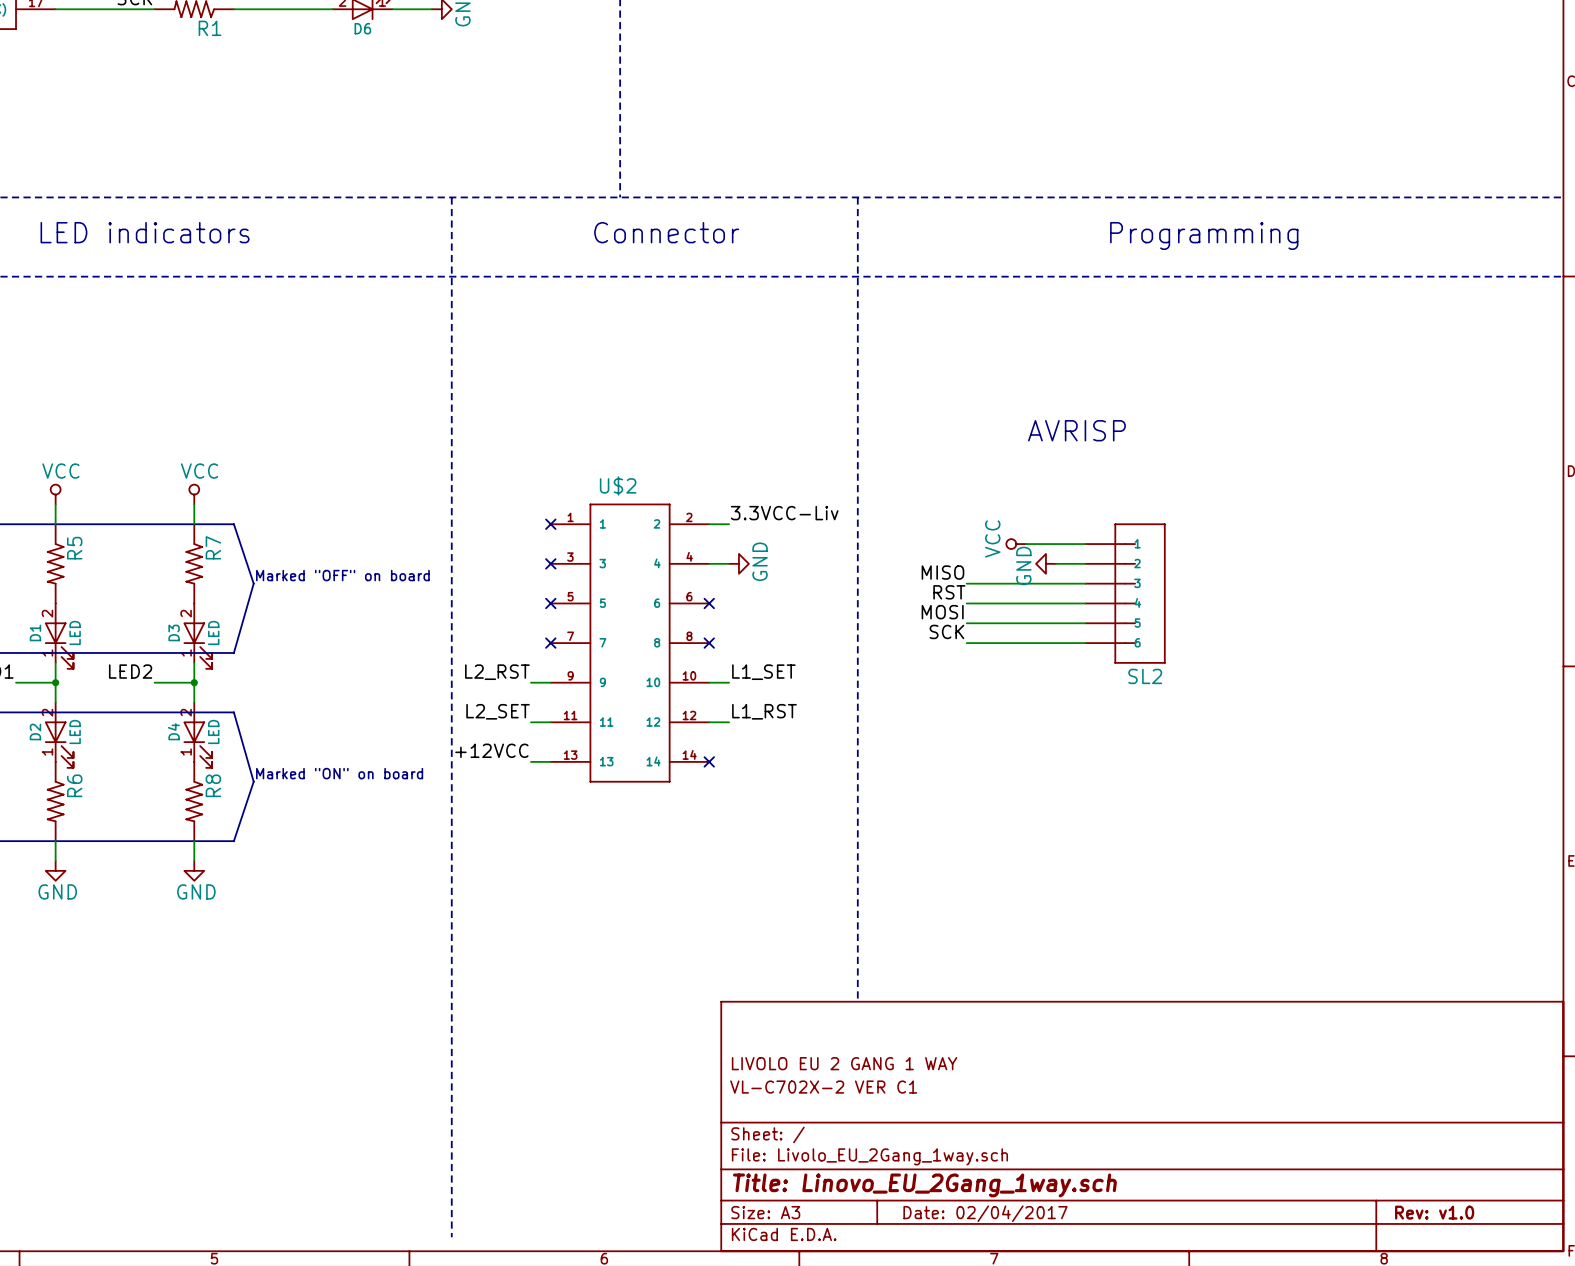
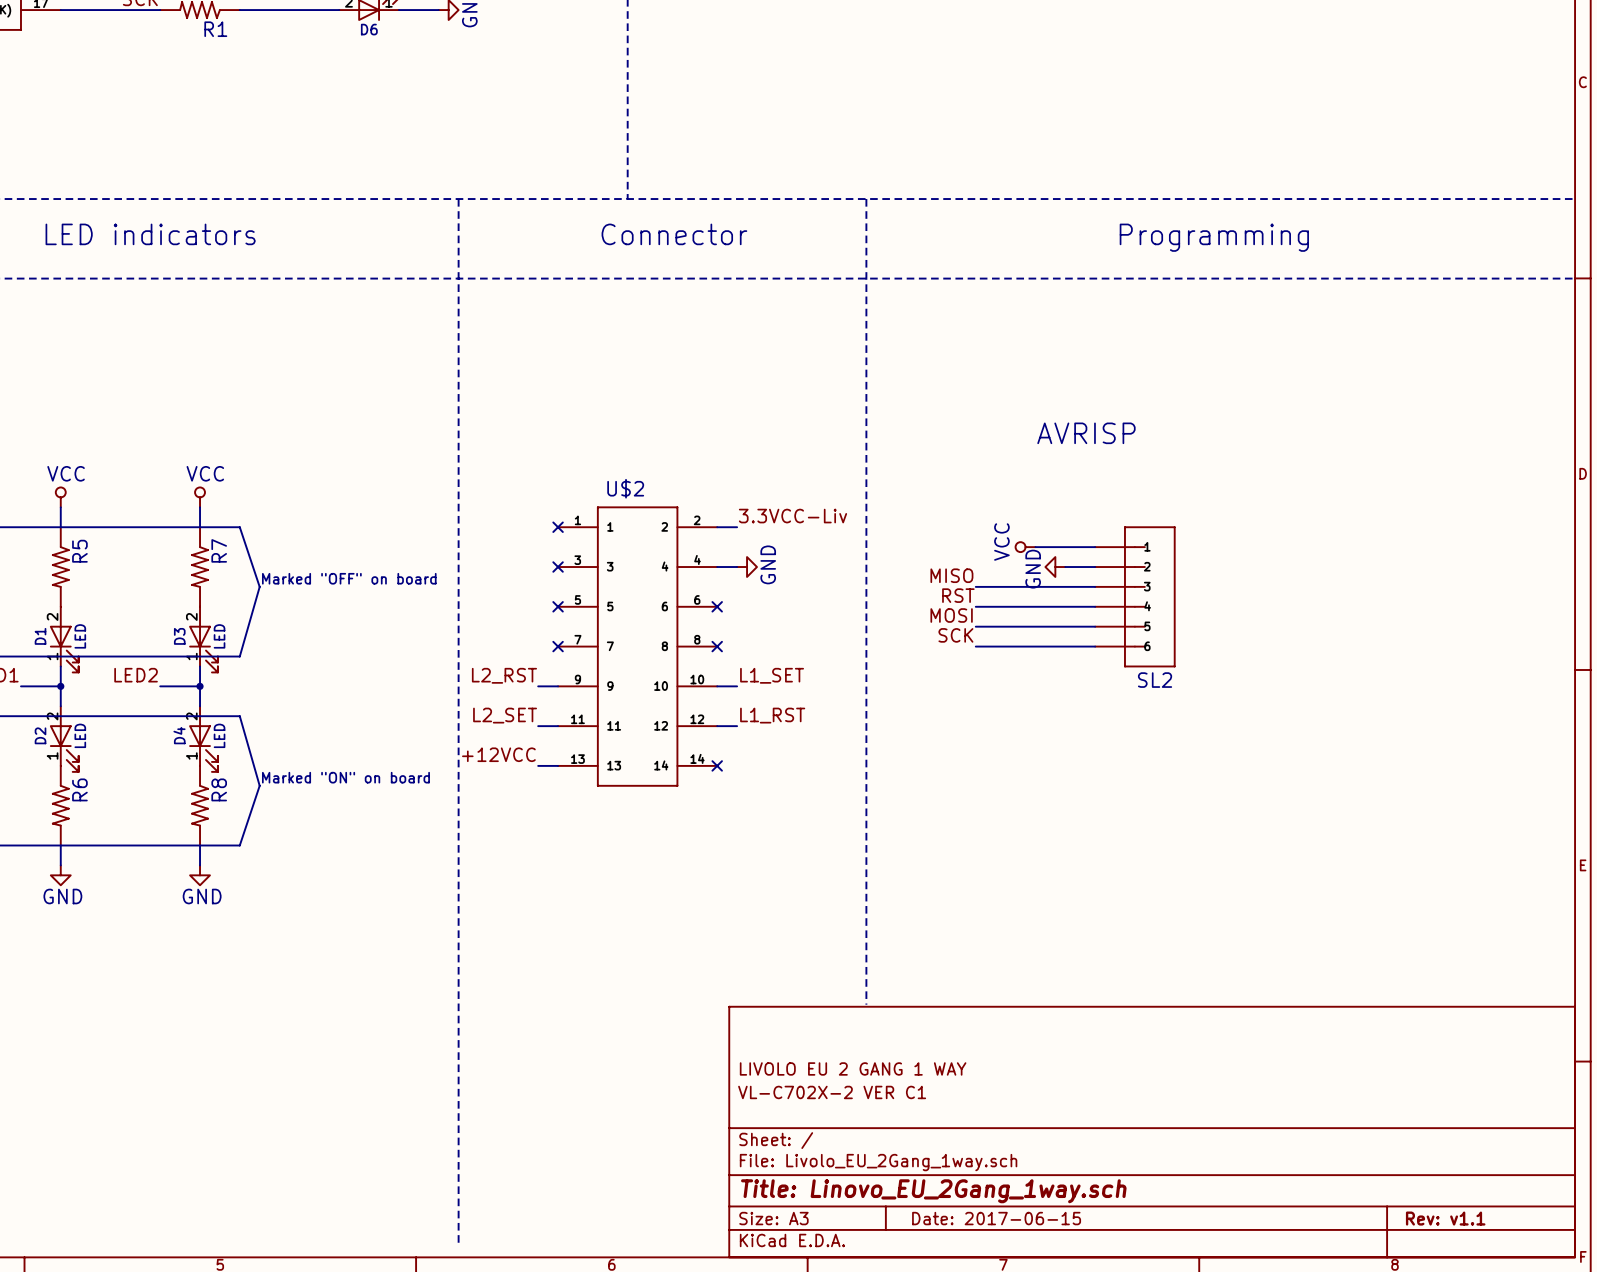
title block: Rev: v1.0 (1434, 1212) -> Rev: v1.1 (1445, 1218)
title block: Date: 02/04/2017 (985, 1213) -> Date: 2017-06-15 (996, 1218)

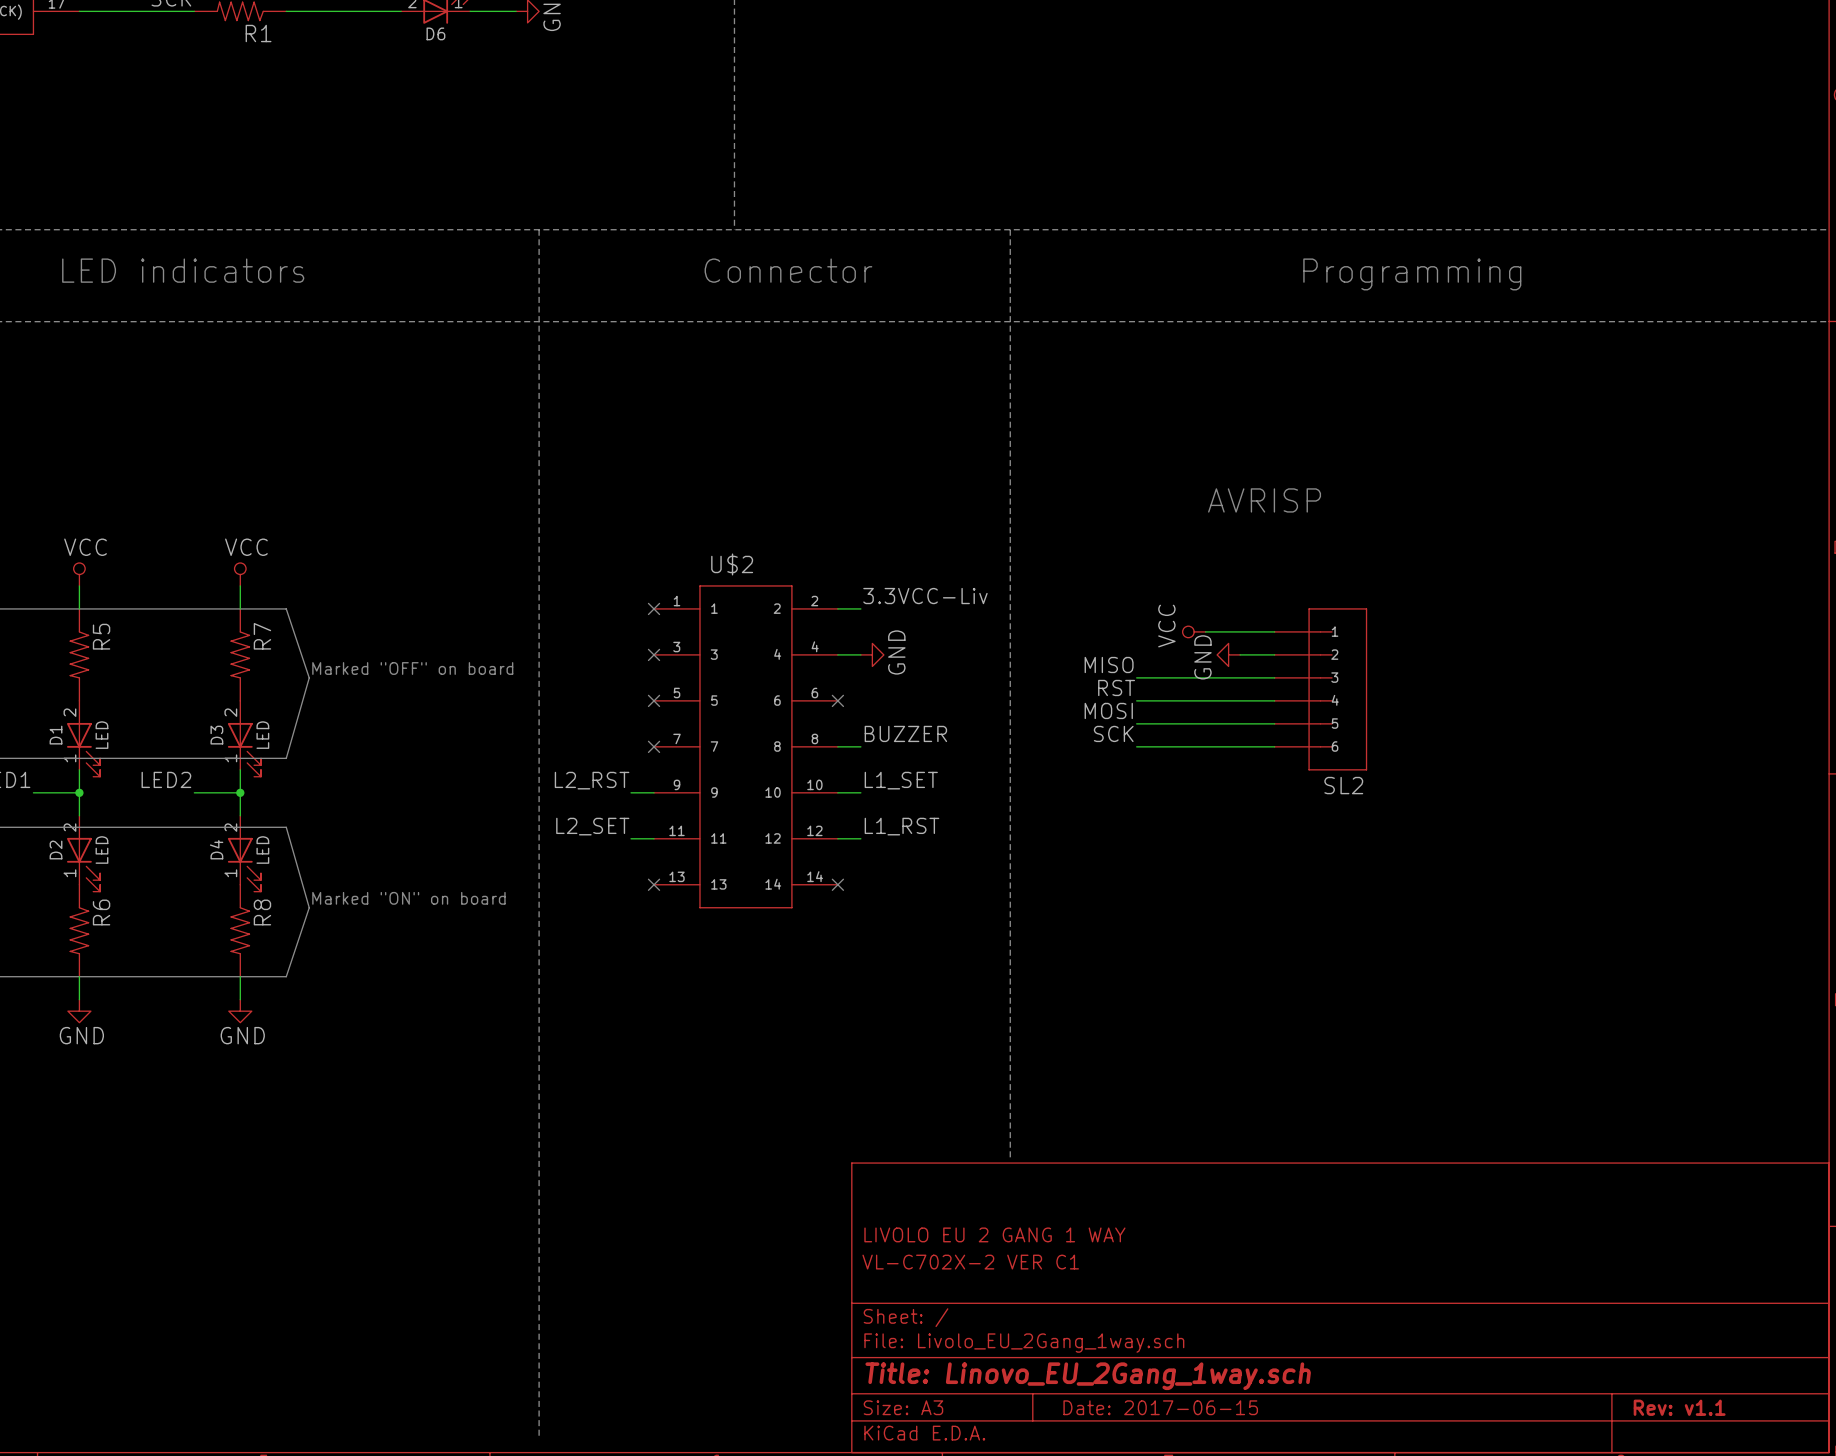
label: none -> BUZZER (905, 733)
wire: none -> (837, 746) (860, 746)
no-connect mark: (717, 646) -> none
label: +12VCC (498, 754) -> none
wire: (538, 765) (558, 765) -> none
no-connect mark: none -> (654, 884)

